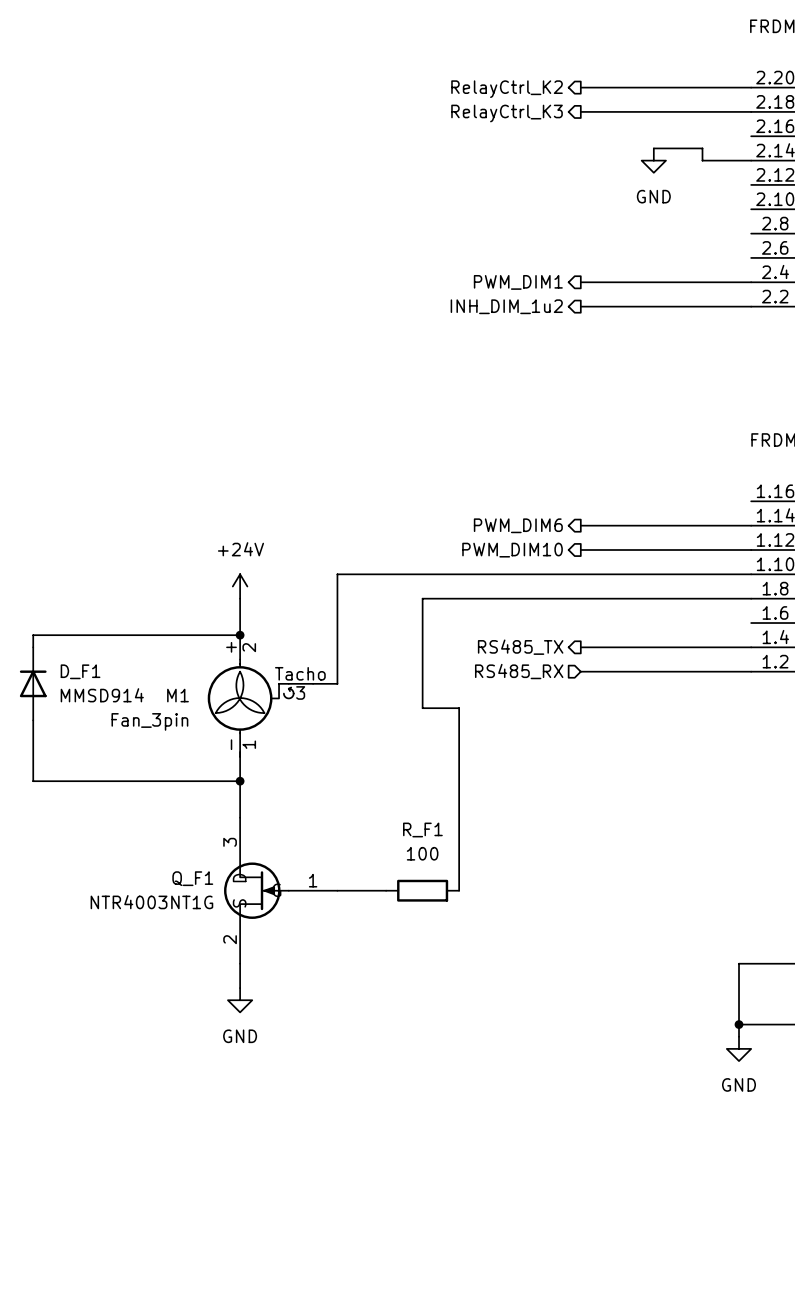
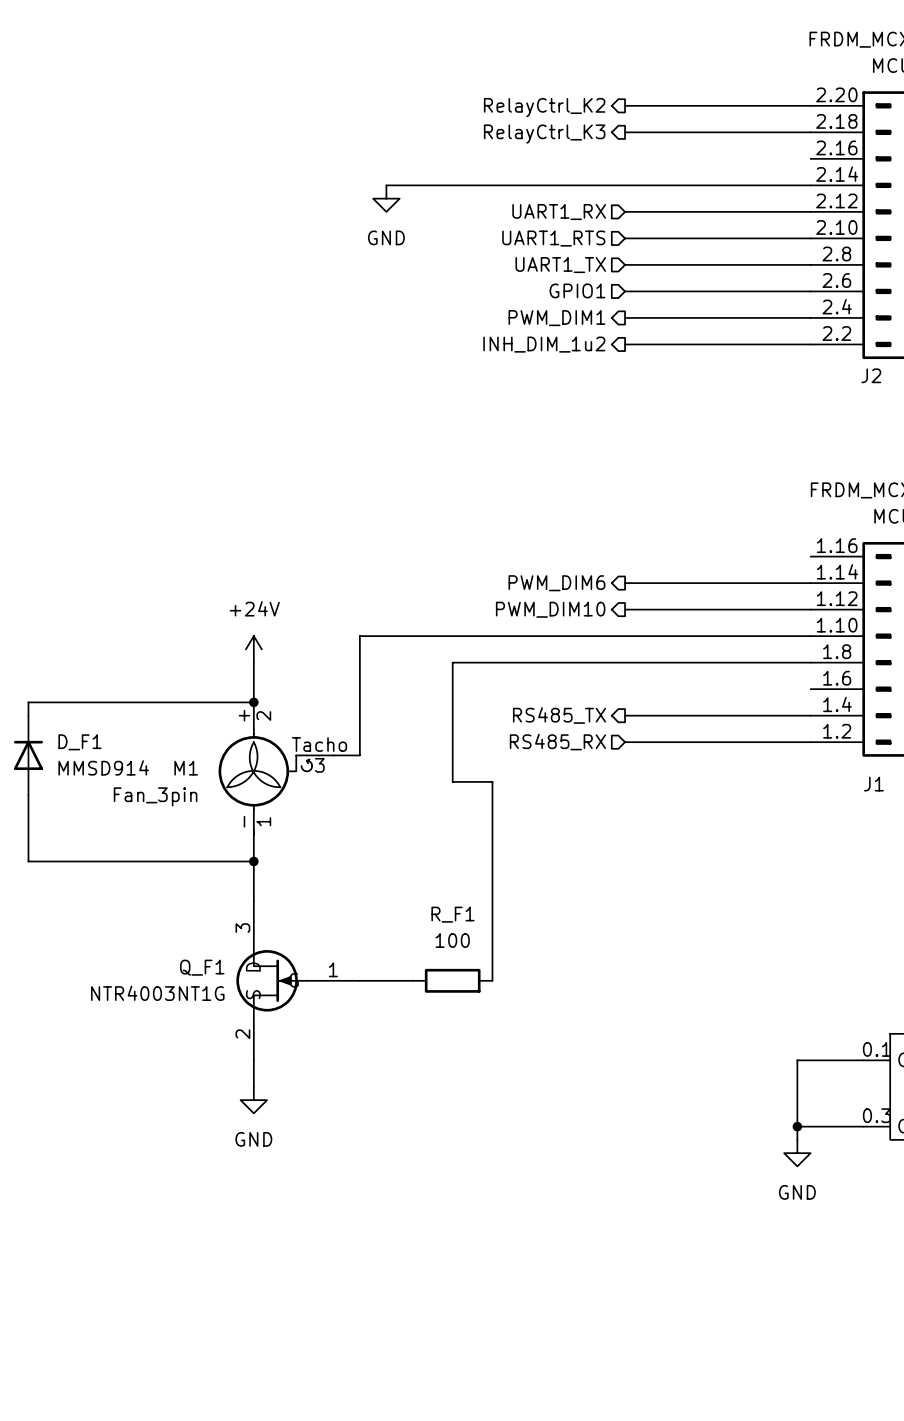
wire: (653, 148) (702, 148) (702, 160) -> (386, 185) (757, 185)
power symbol: GND (653, 160) -> none
power symbol: none -> GND (386, 198)
wire: none -> (625, 211) (810, 211)
hierarchical label: none -> UART1_RX (559, 212)
hierarchical label: none -> UART1_RTS (553, 238)
wire: none -> (625, 238) (810, 238)
hierarchical label: none -> UART1_TX (560, 265)
wire: none -> (625, 264) (810, 264)
hierarchical label: none -> GPIO1 (577, 290)
wire: none -> (625, 291) (810, 291)

